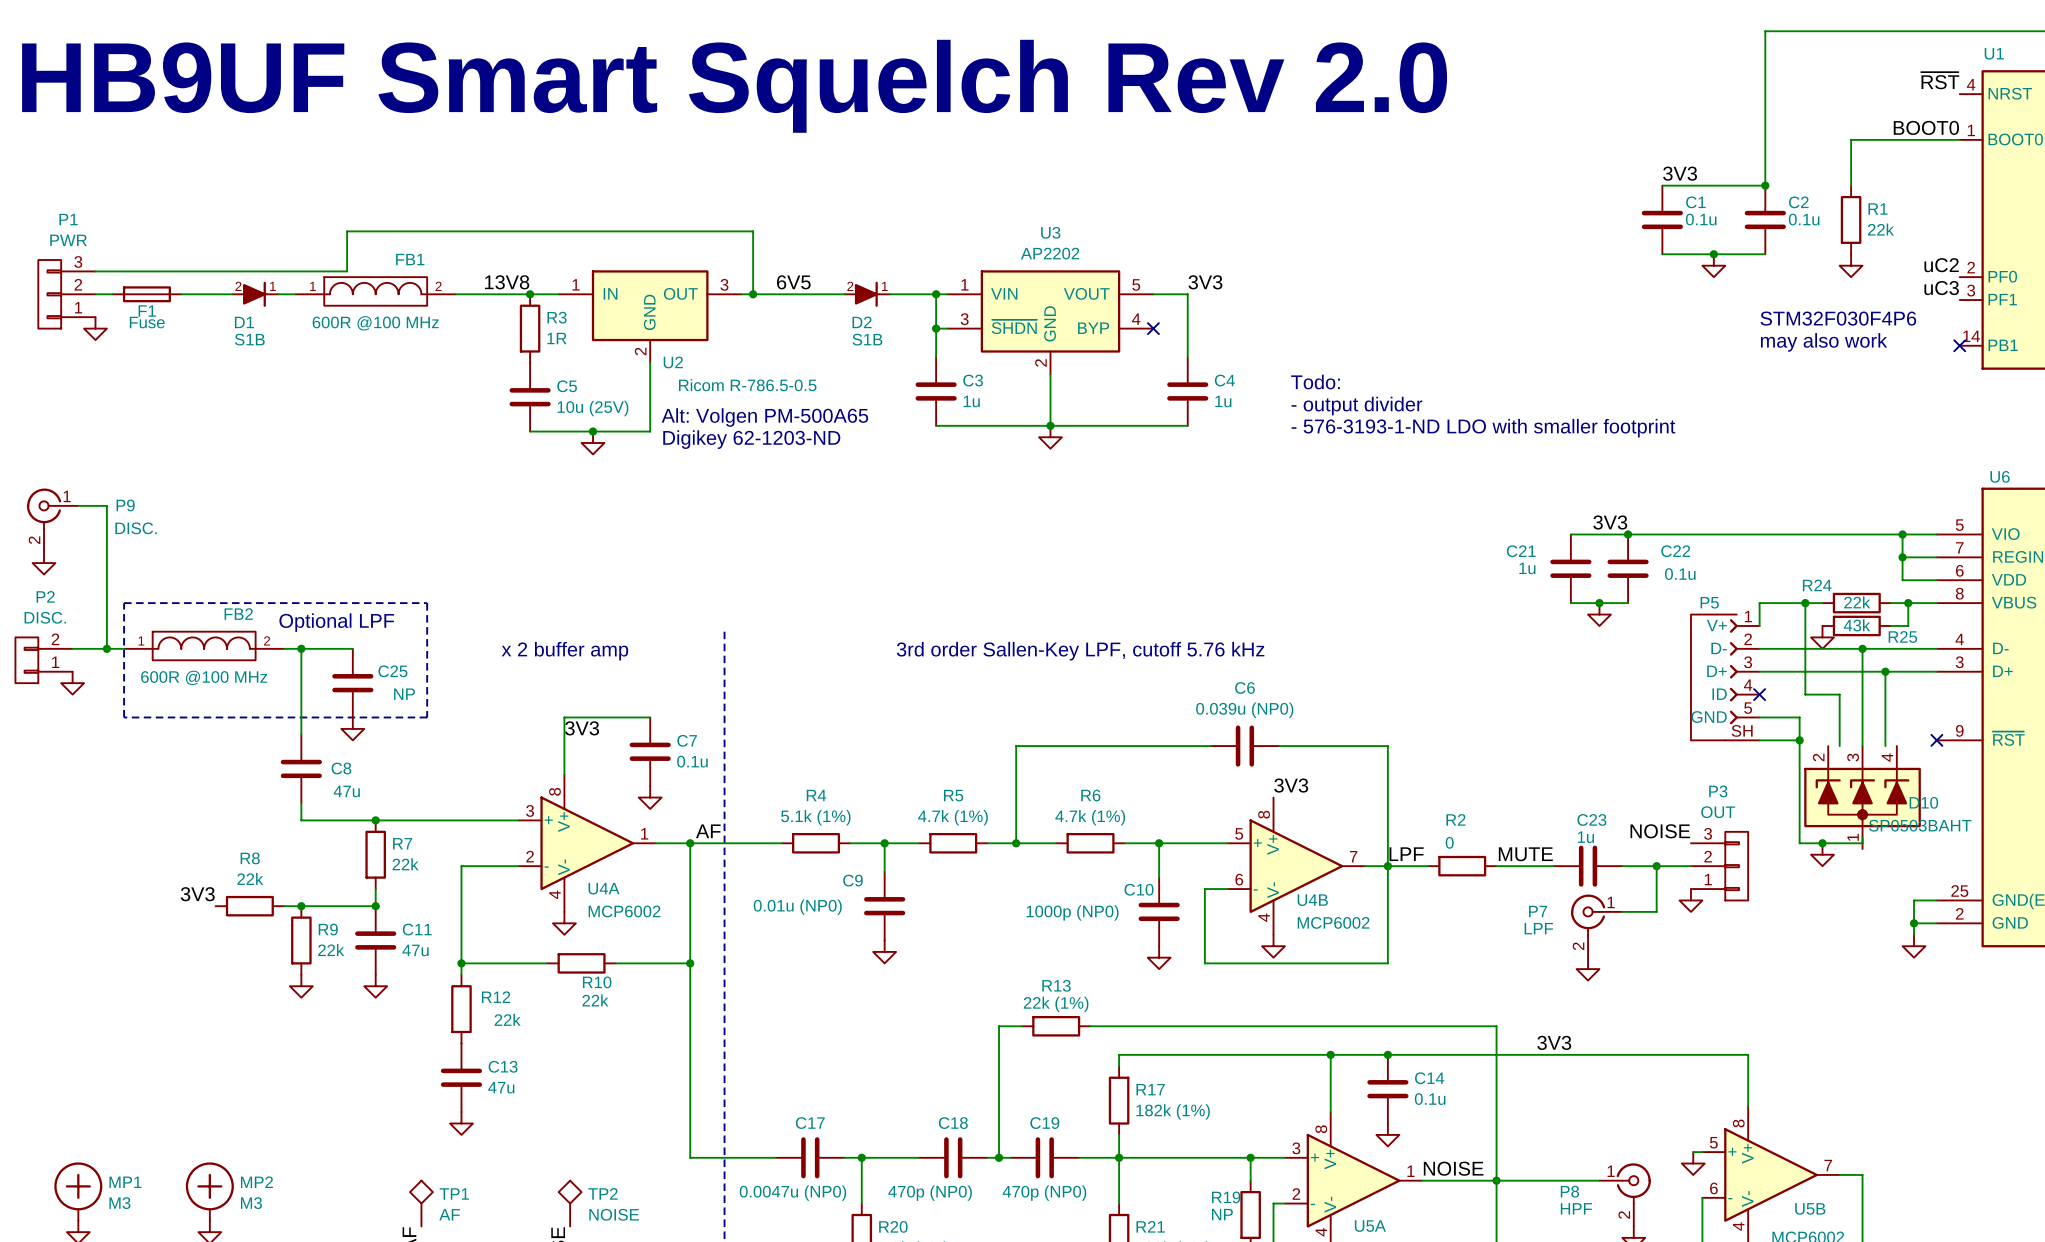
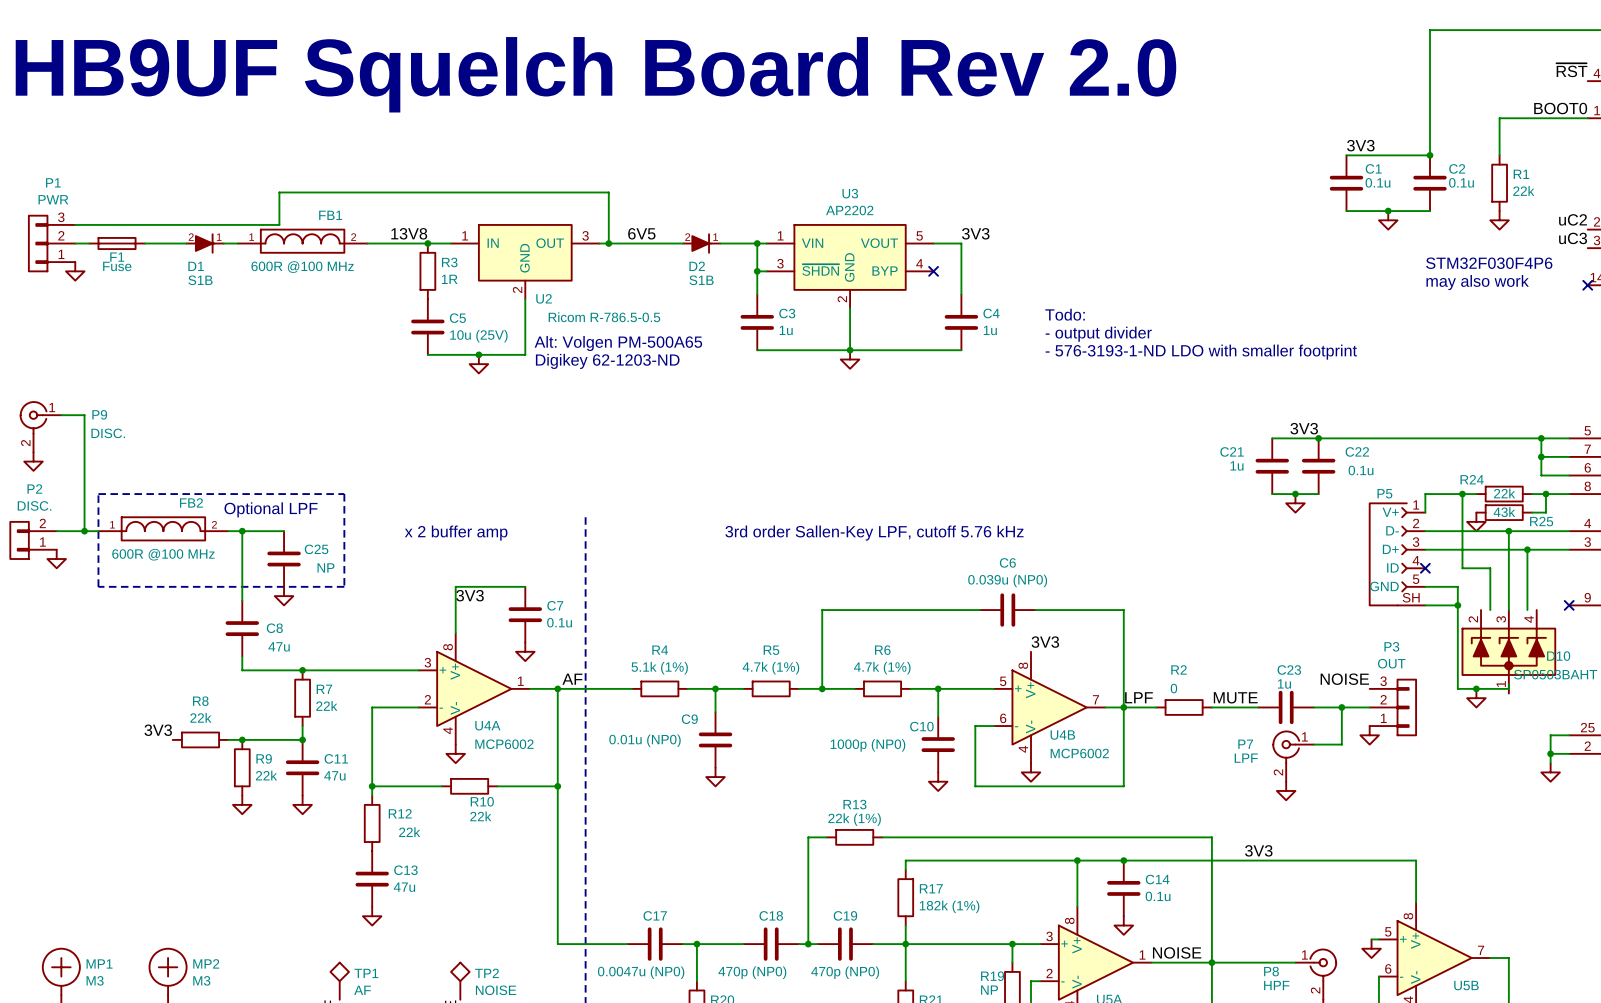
text: HB9UF Smart Squelch Rev 2.0 (734, 86) -> HB9UF Squelch Board Rev 2.0 (595, 74)

